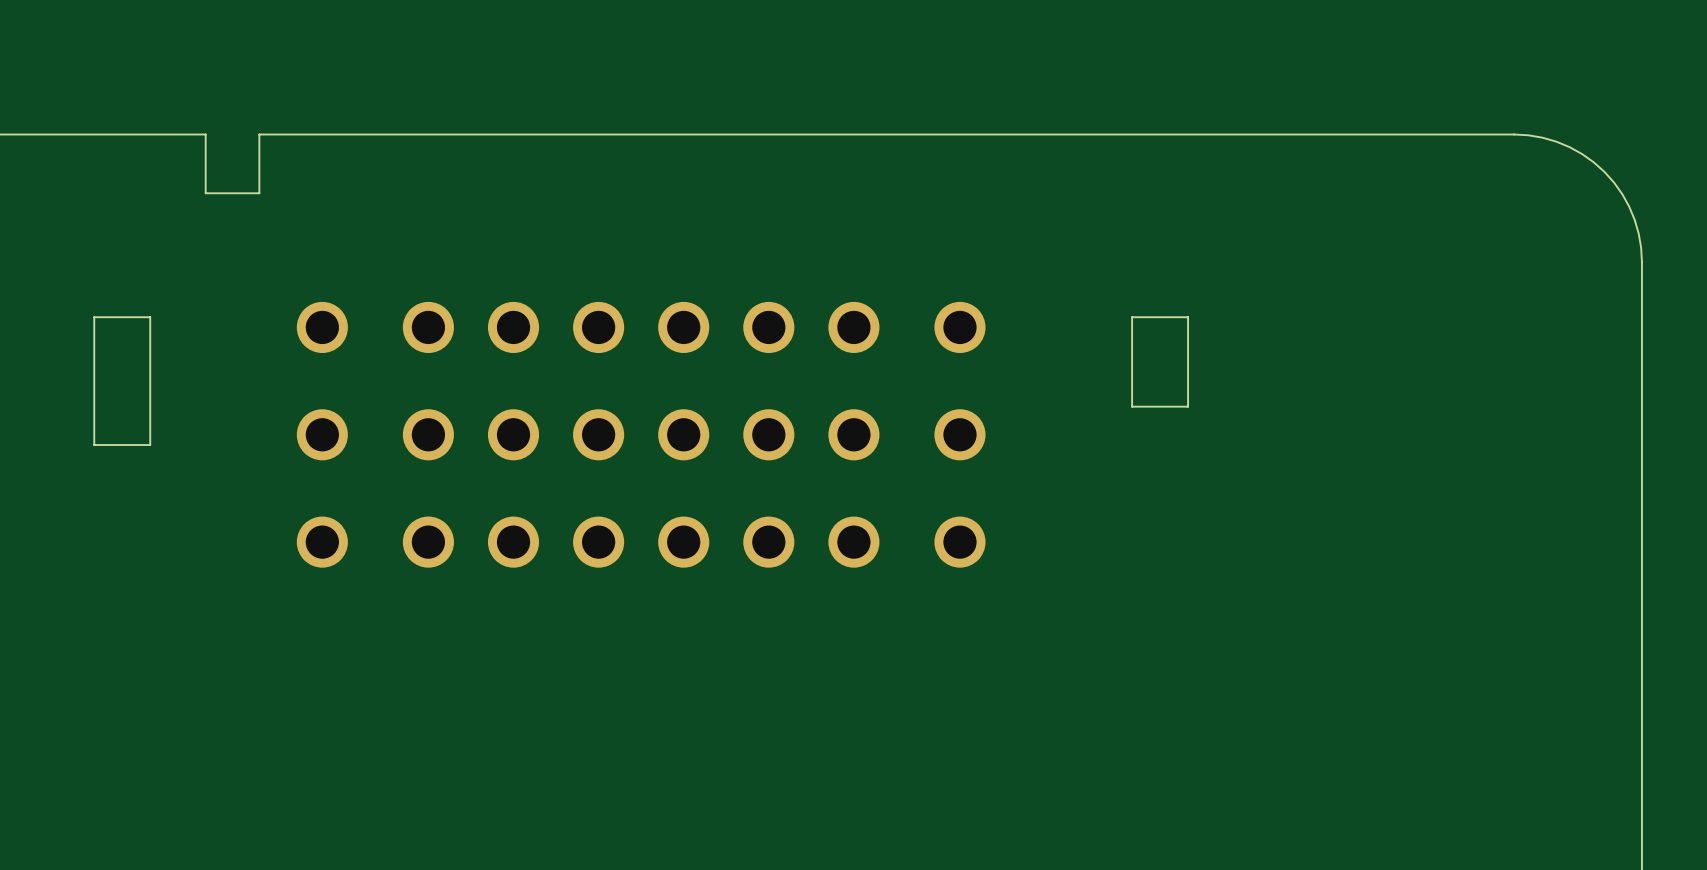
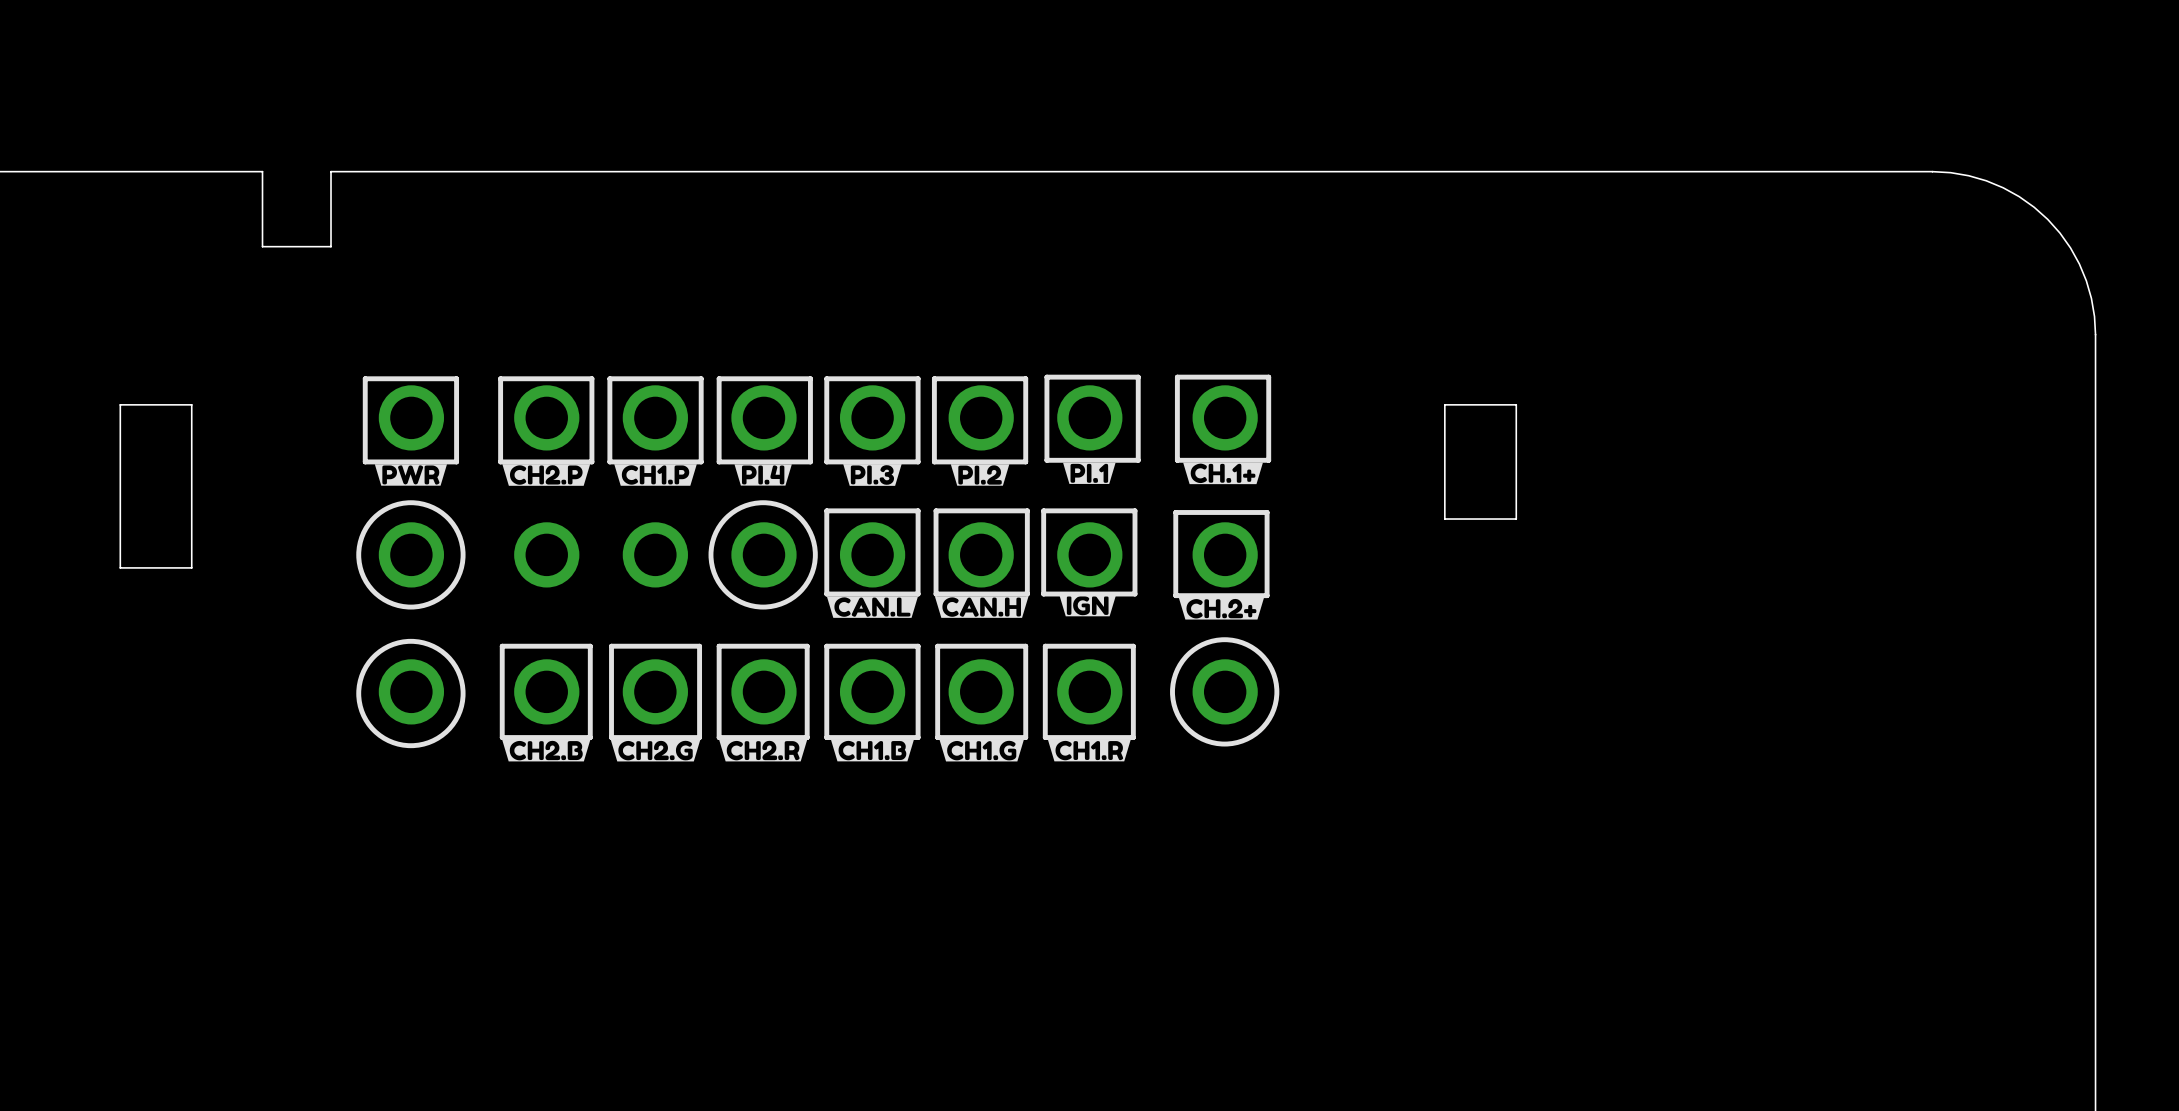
line: none -> (1138, 377) (1046, 377) (1046, 460) (1138, 460) (1138, 377)
line: none -> (1268, 377) (1177, 377) (1177, 460) (1268, 460) (1268, 377)
line: none -> (456, 378) (365, 378) (365, 461) (456, 461) (456, 378)
line: none -> (591, 378) (500, 378) (500, 461) (591, 461) (591, 378)
line: none -> (701, 378) (609, 378) (609, 461) (701, 461) (701, 378)
line: none -> (810, 378) (719, 378) (719, 461) (810, 461) (810, 378)
line: none -> (918, 378) (826, 378) (826, 461) (918, 461) (918, 378)
line: none -> (1025, 378) (934, 378) (934, 461) (1025, 461) (1025, 378)
drawing: none -> [1063, 462, 1116, 484]
drawing: none -> [1183, 462, 1263, 485]
drawing: none -> [356, 464, 1131, 762]
drawing: none -> [502, 464, 1117, 618]
drawing: none -> [950, 464, 1010, 486]
line: none -> (918, 510) (918, 594) (826, 594) (826, 510) (918, 510)
line: none -> (1027, 510) (936, 510) (936, 594) (1027, 594) (1027, 510)
line: none -> (1134, 510) (1043, 510) (1043, 594) (1134, 594) (1134, 510)
line: none -> (1267, 512) (1175, 512) (1175, 595) (1267, 595) (1267, 512)
drawing: none -> [1170, 597, 1280, 747]
line: none -> (590, 646) (502, 646) (502, 737) (590, 737) (590, 646)
line: none -> (699, 646) (611, 646) (611, 737) (699, 737) (699, 646)
line: none -> (807, 646) (719, 646) (719, 737) (807, 737) (807, 646)
line: none -> (918, 646) (826, 646) (826, 737) (918, 737) (918, 646)
line: none -> (1025, 646) (937, 646) (937, 737) (1025, 737) (1025, 646)
line: none -> (1133, 646) (1045, 646) (1045, 737) (1133, 737) (1133, 646)

